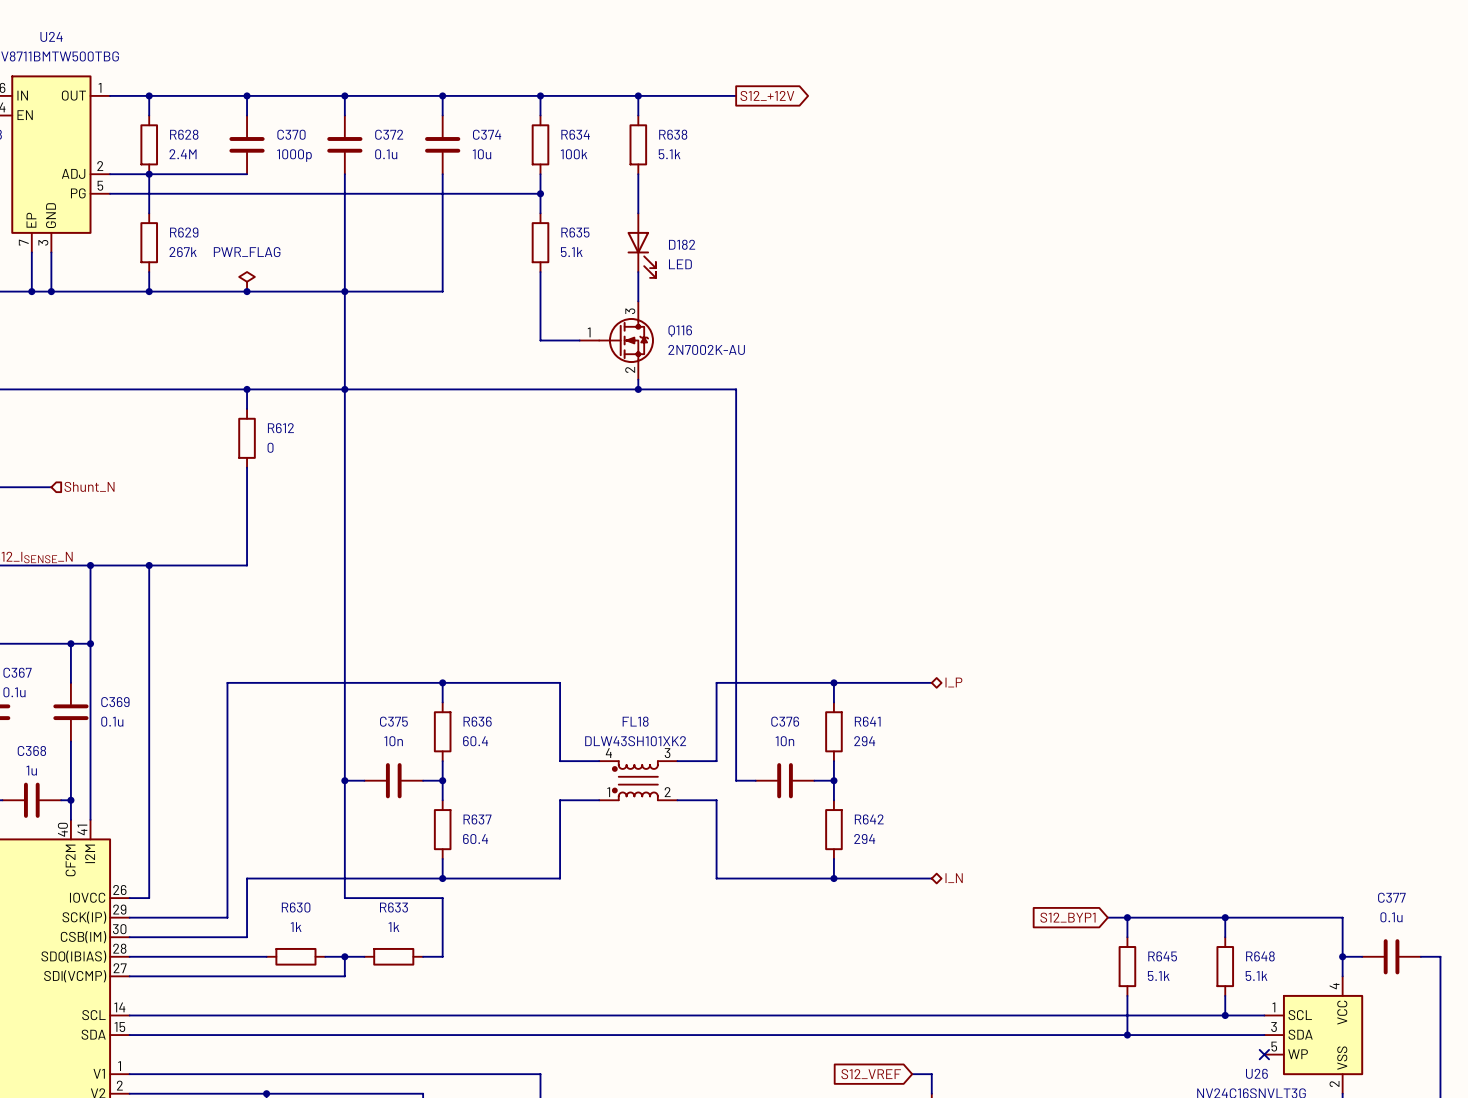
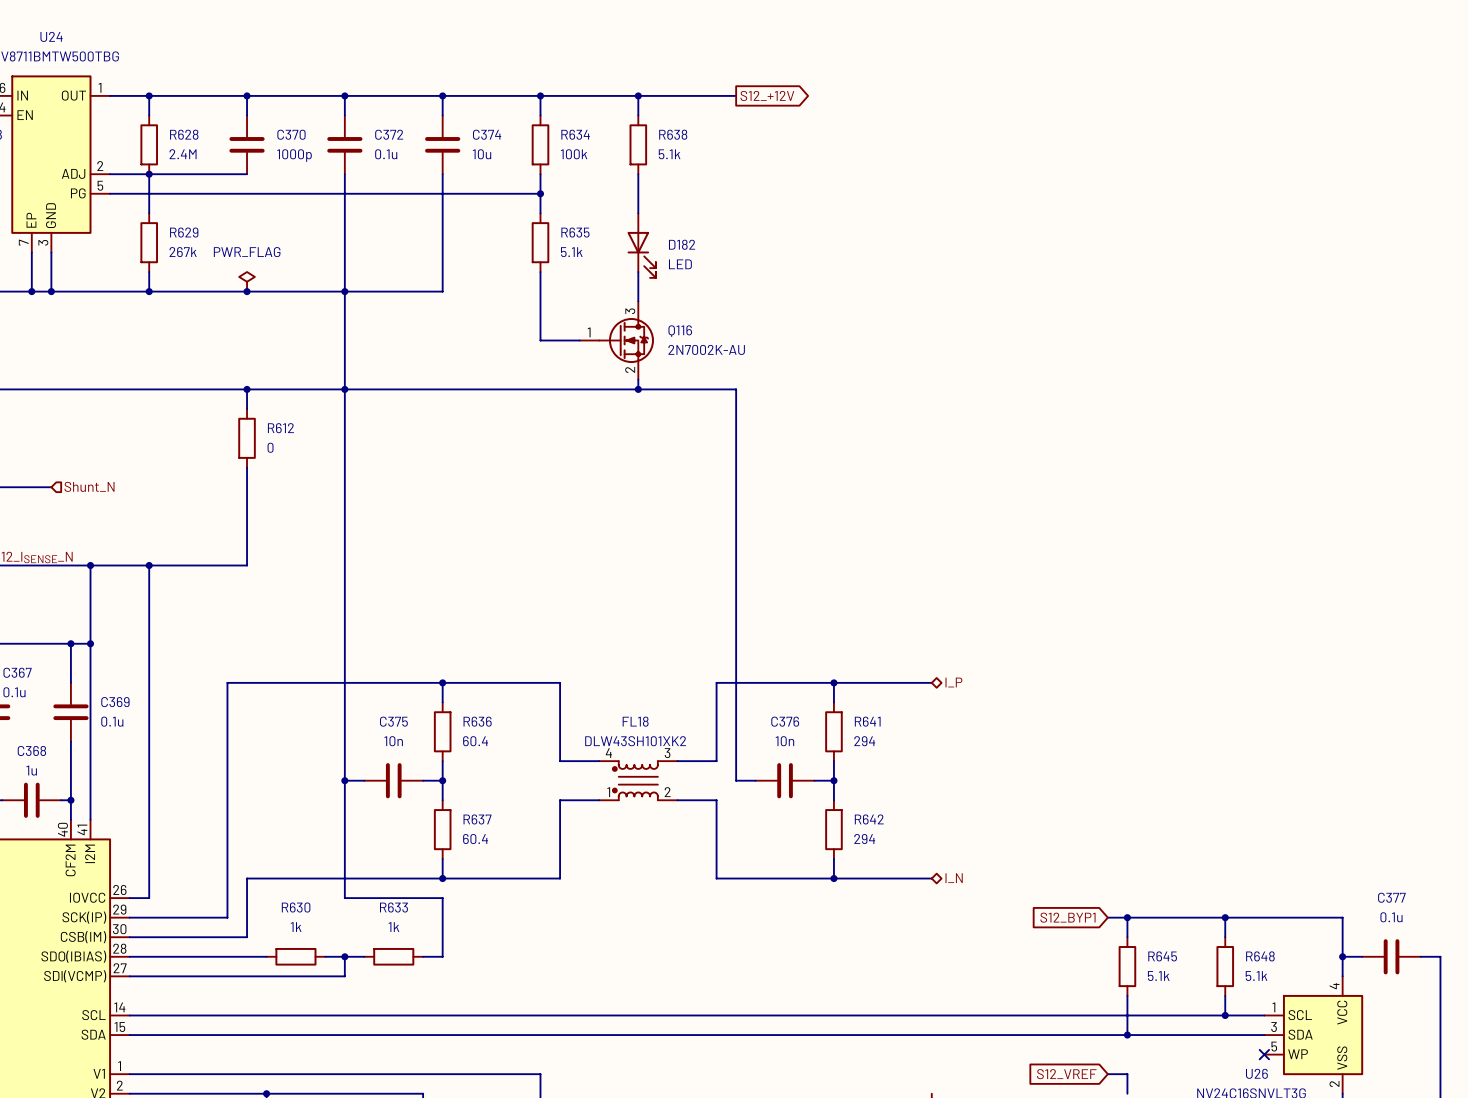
global label: S12_VREF (871, 1074) -> none
wire: (912, 1074) (931, 1074) (931, 1093) -> none
global label: none -> S12_VREF (1066, 1074)
wire: none -> (1107, 1074) (1127, 1074) (1127, 1093)

